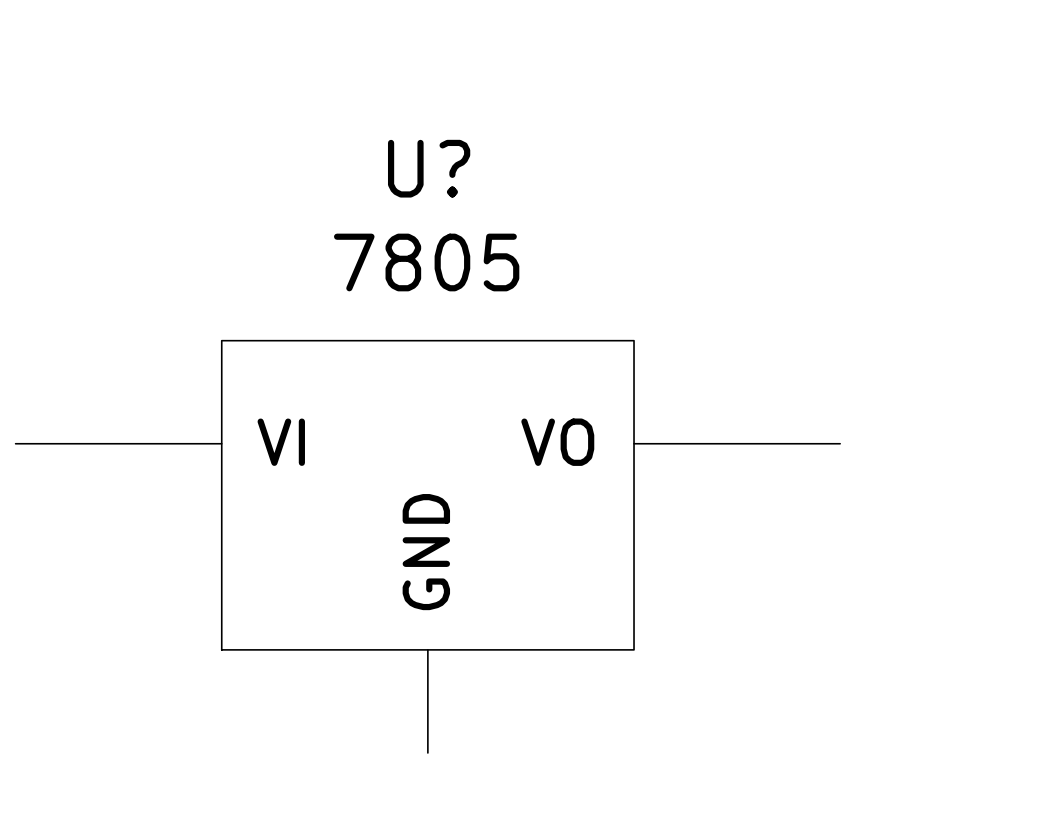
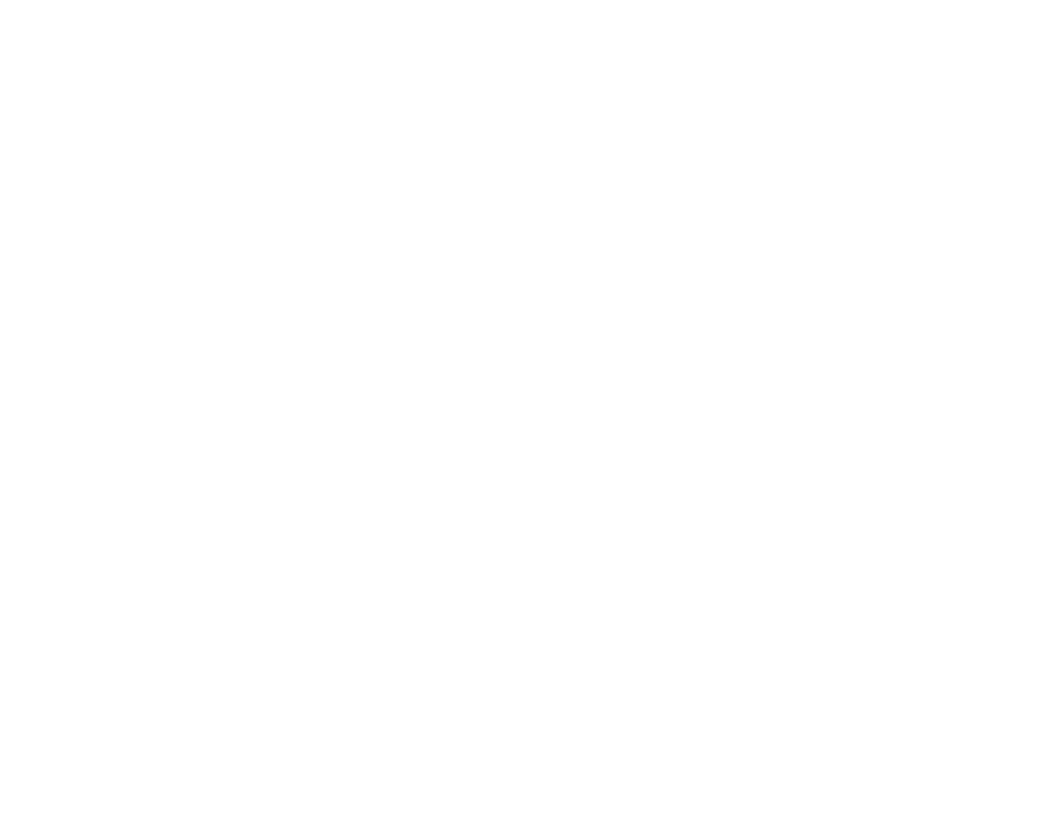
U?: 7805 (427, 546) -> none

